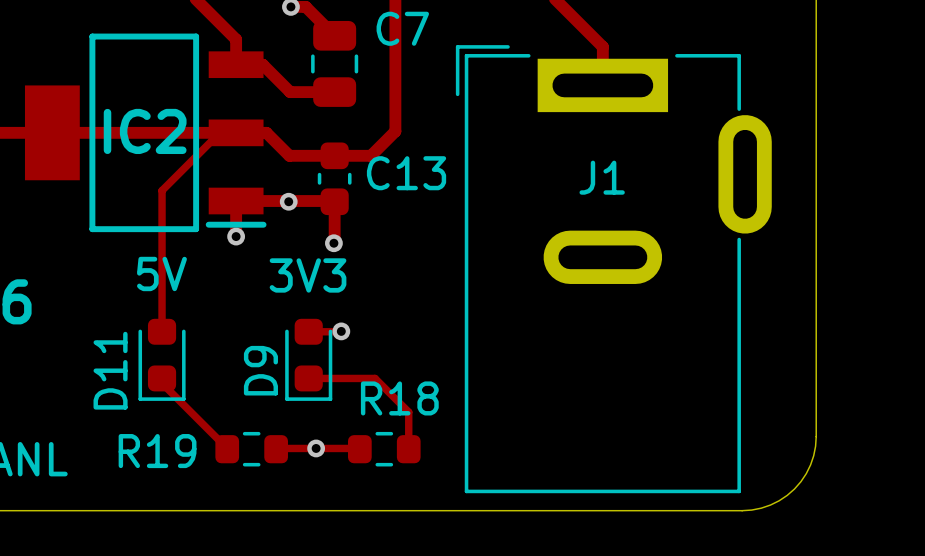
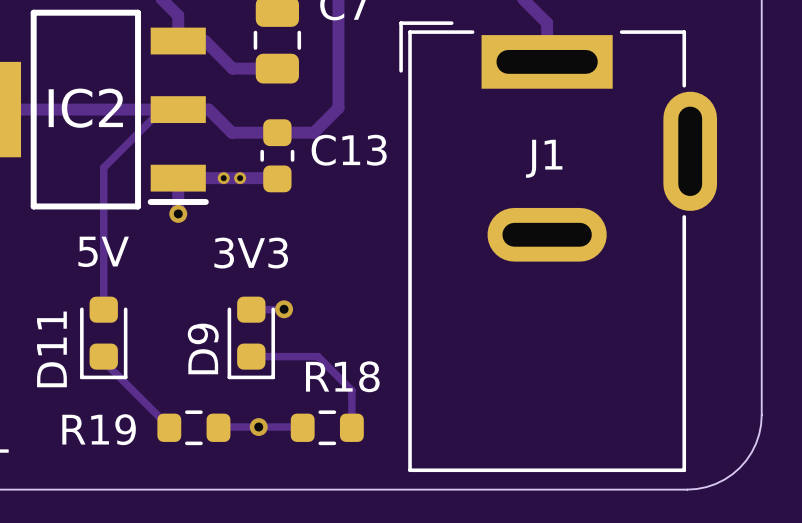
via: none -> (223, 178)
via: (288, 201) -> none
via: none -> (240, 178)
track: (334, 201) (333, 243) -> none
via: (333, 243) -> none

